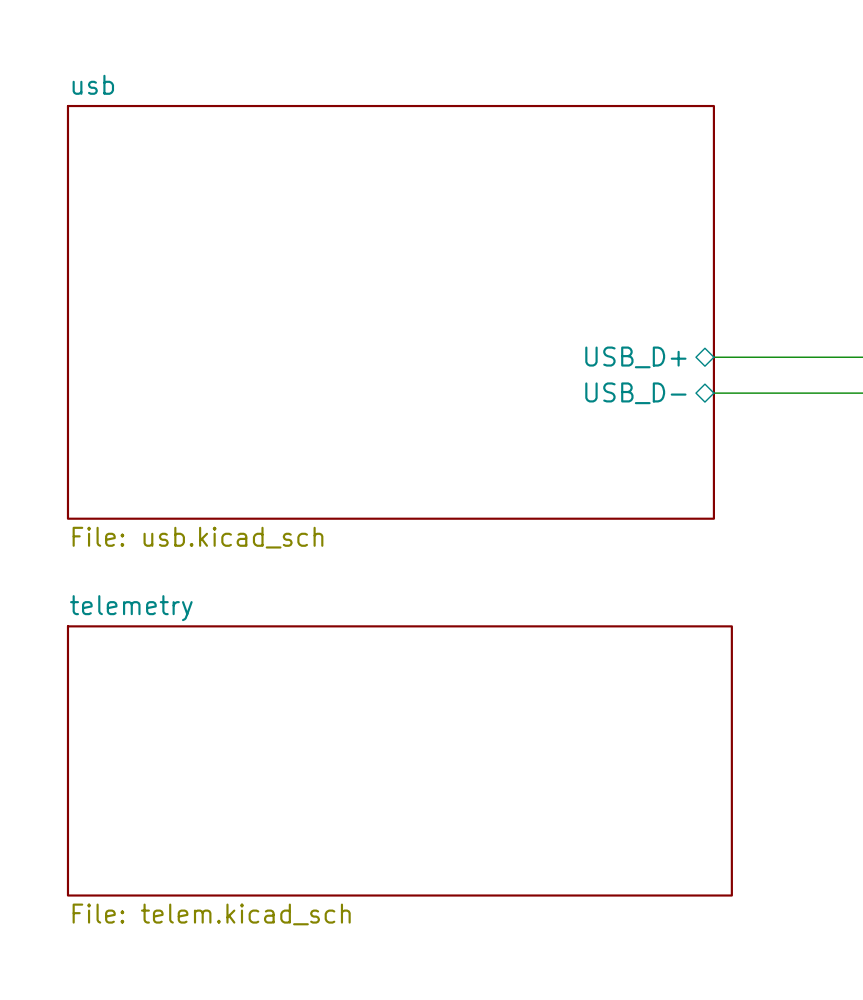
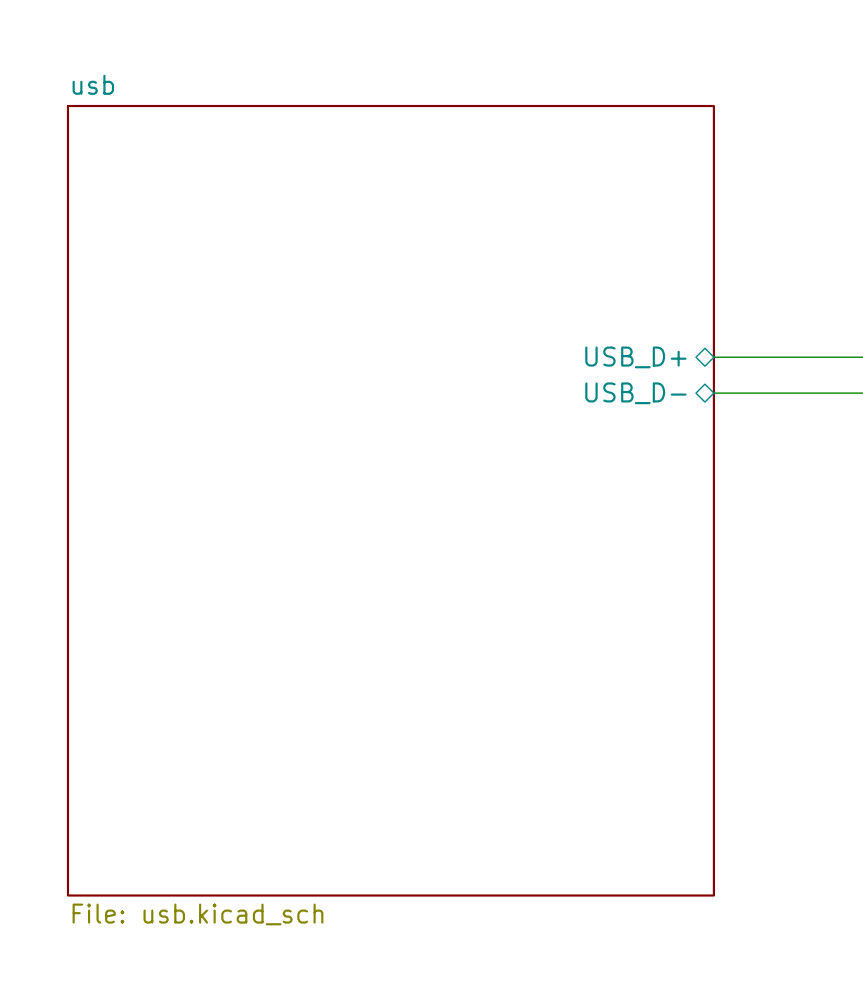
sheet usb: File: usb.kicad_sch (390, 312) -> none
sheet usb: none -> File: usb.kicad_sch (390, 500)
sheet telemetry: File: telem.kicad_sch (399, 760) -> none

